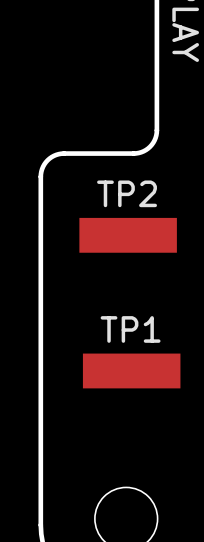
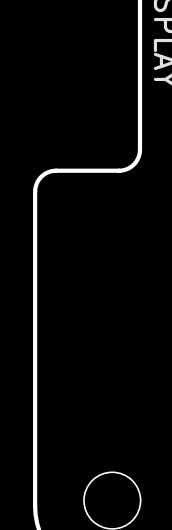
TP2: (128, 235) -> none
TP1: (131, 370) -> none

